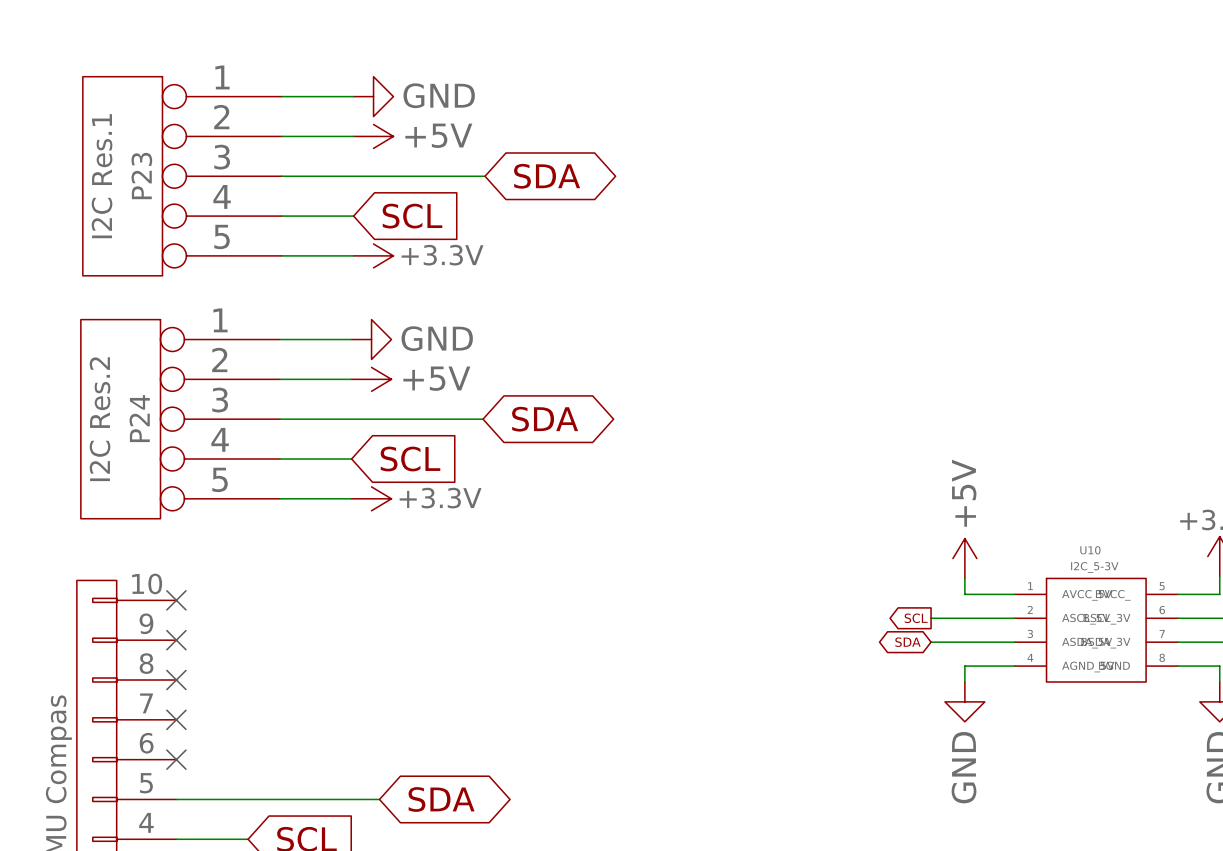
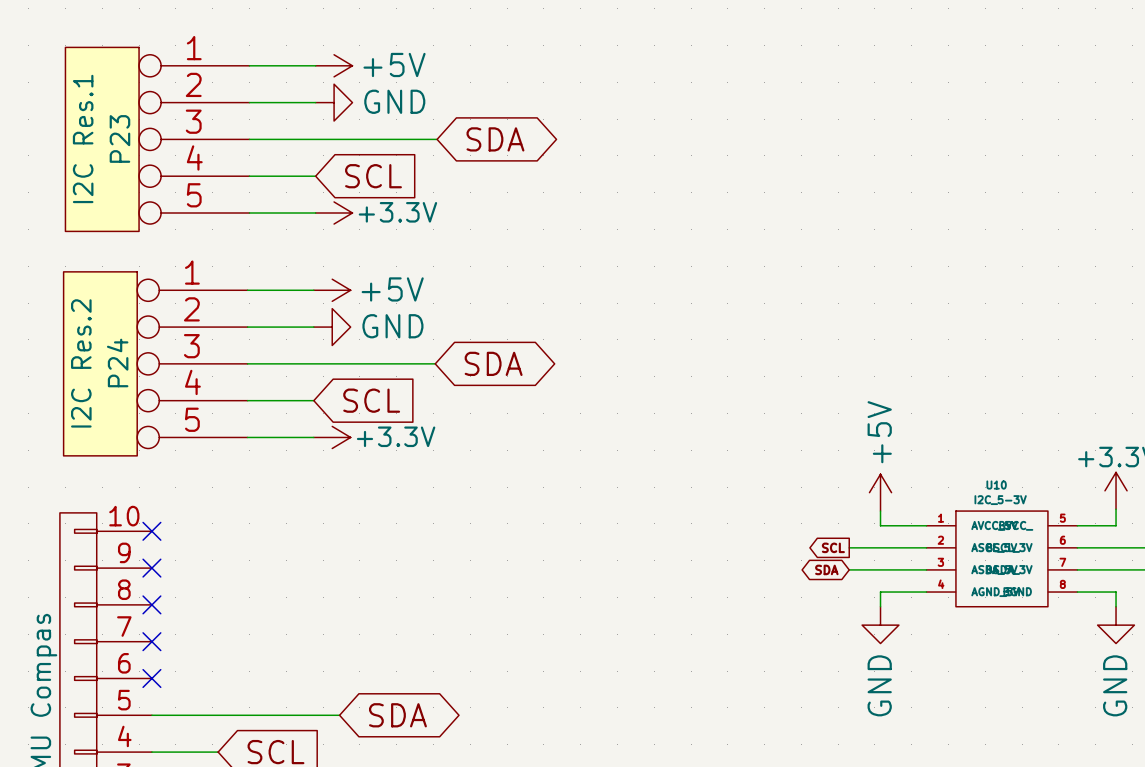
power symbol: GND (373, 96) -> +5V (334, 65)
power symbol: +5V (373, 136) -> GND (334, 102)
power symbol: GND (371, 339) -> +5V (332, 290)
power symbol: +5V (371, 379) -> GND (332, 327)

